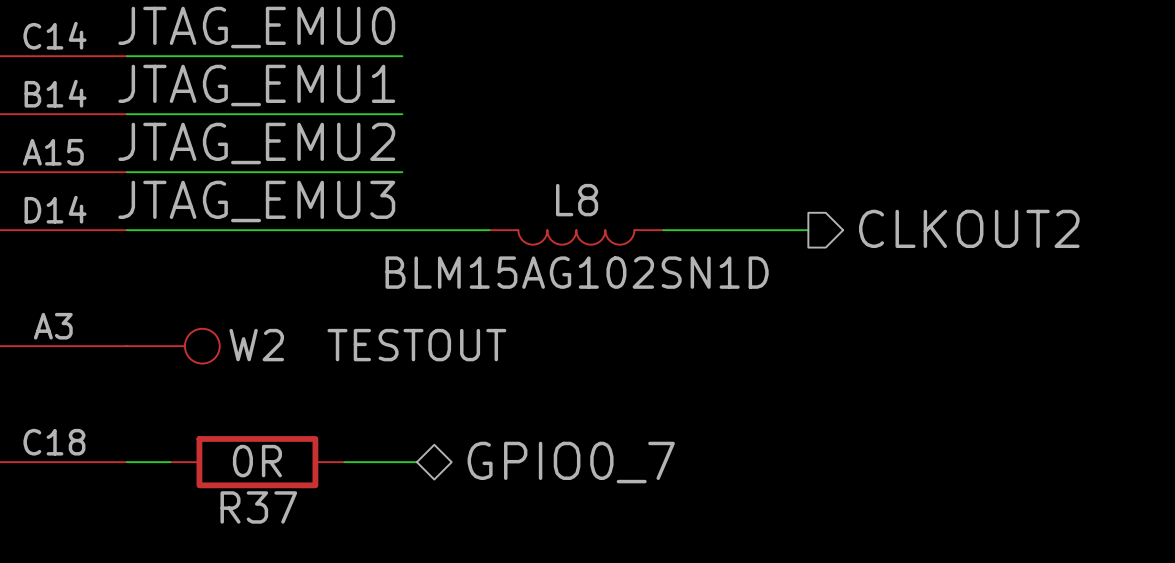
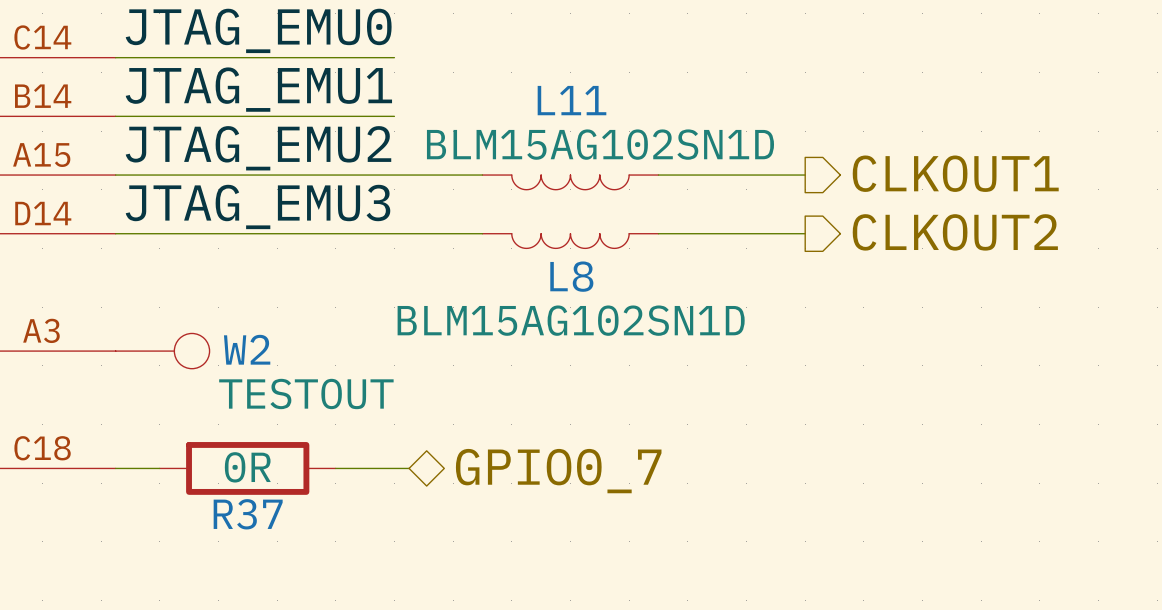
hierarchical label: none -> CLKOUT1 (955, 173)
wire: none -> (394, 175) (482, 175)
wire: none -> (658, 175) (805, 175)
L11: none -> BLM15AG102SN1D (570, 182)
L8 name position: L8 (577, 200) -> L8 (571, 276)
L8 value position: BLM15AG102SN1D (577, 272) -> BLM15AG102SN1D (571, 320)
W2 value position: TESTOUT (416, 345) -> TESTOUT (306, 393)

